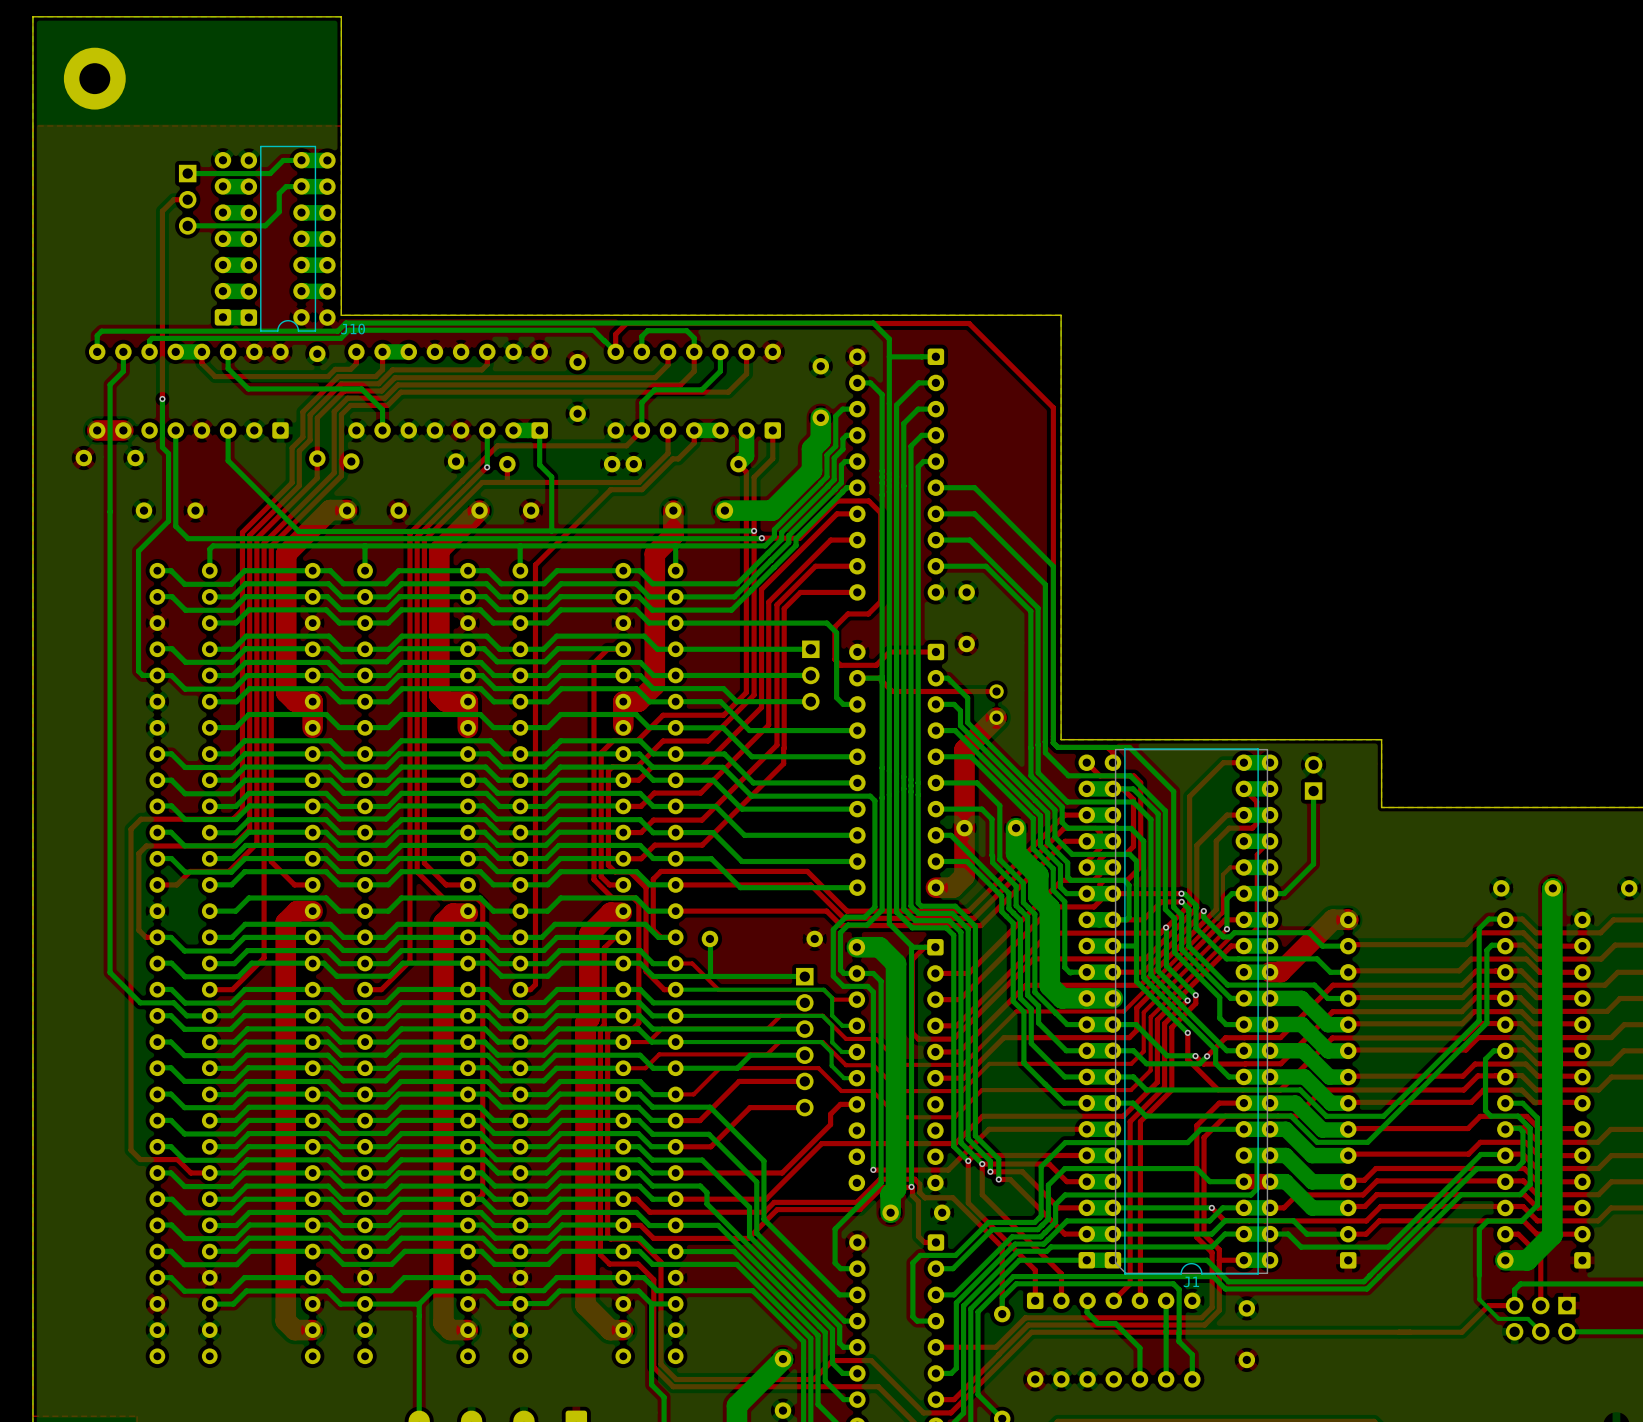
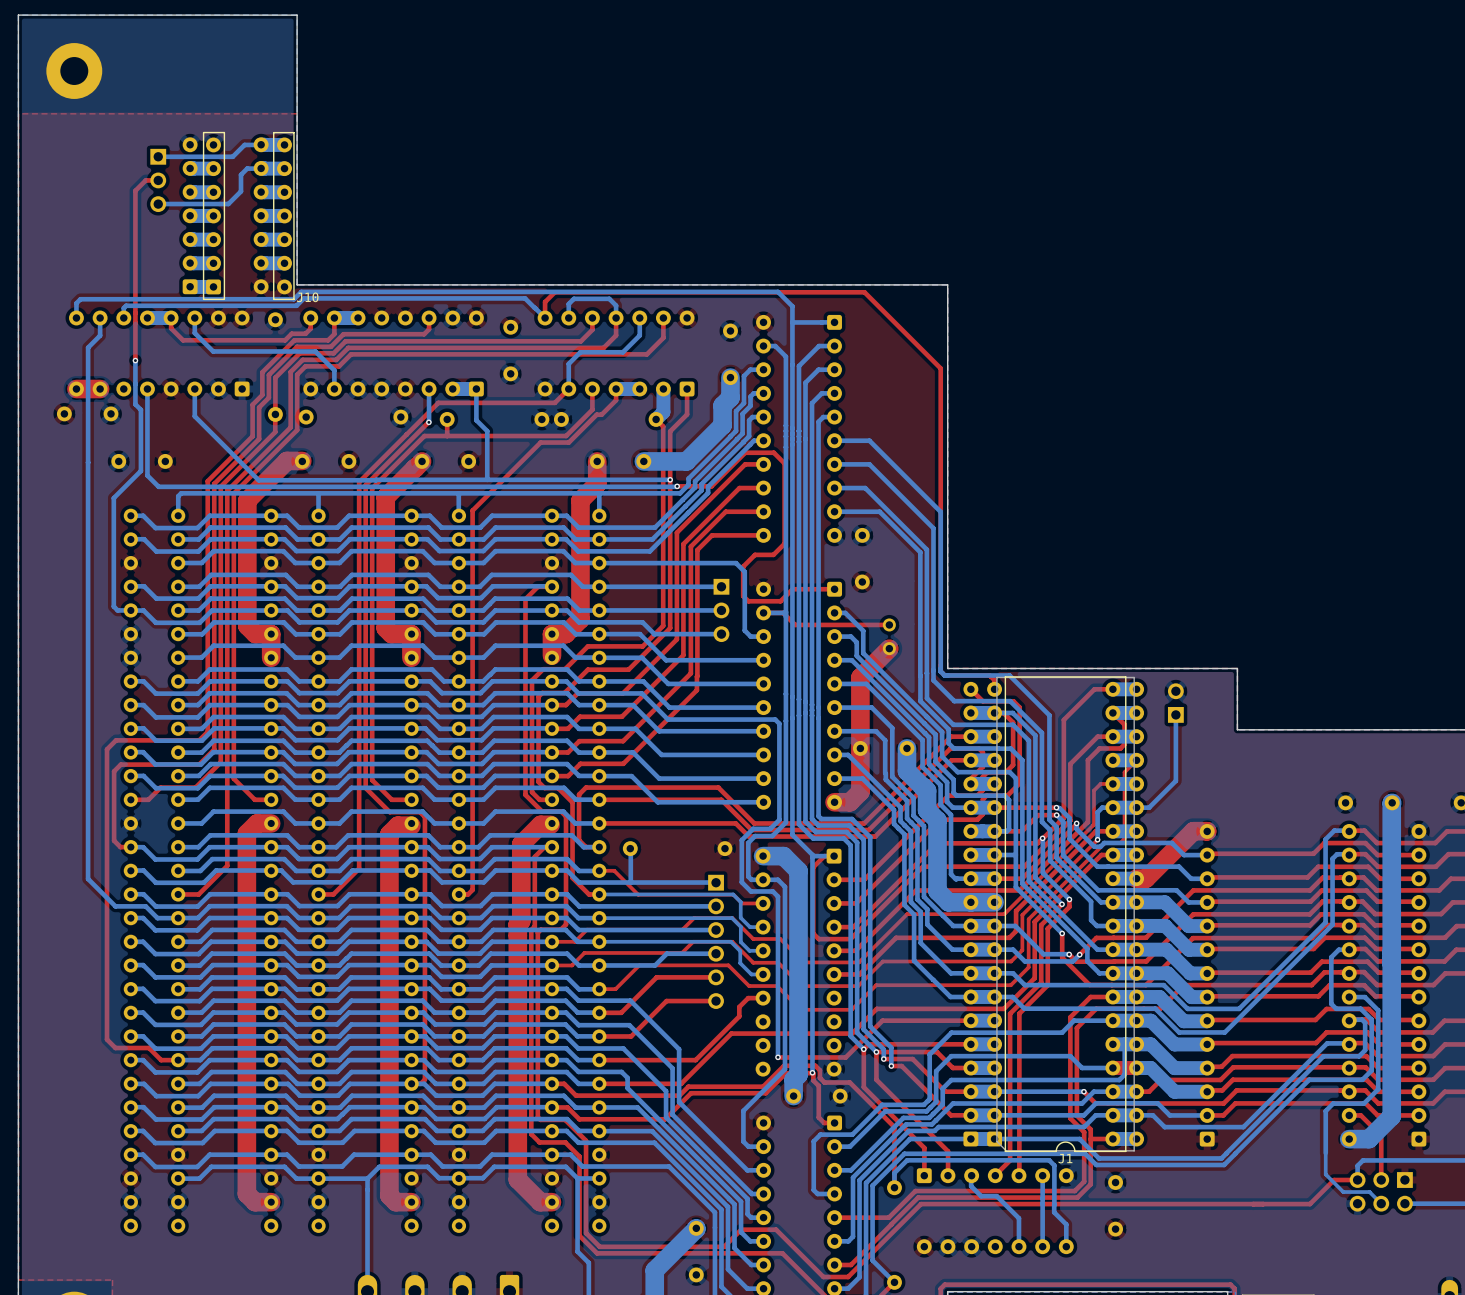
J10 footprint: [240, 145, 336, 332] -> [203, 131, 295, 300]

